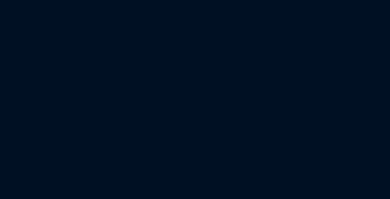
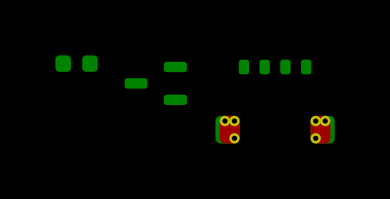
part: none -> (76, 63)
part: none -> (155, 83)
part: none -> (275, 101)

